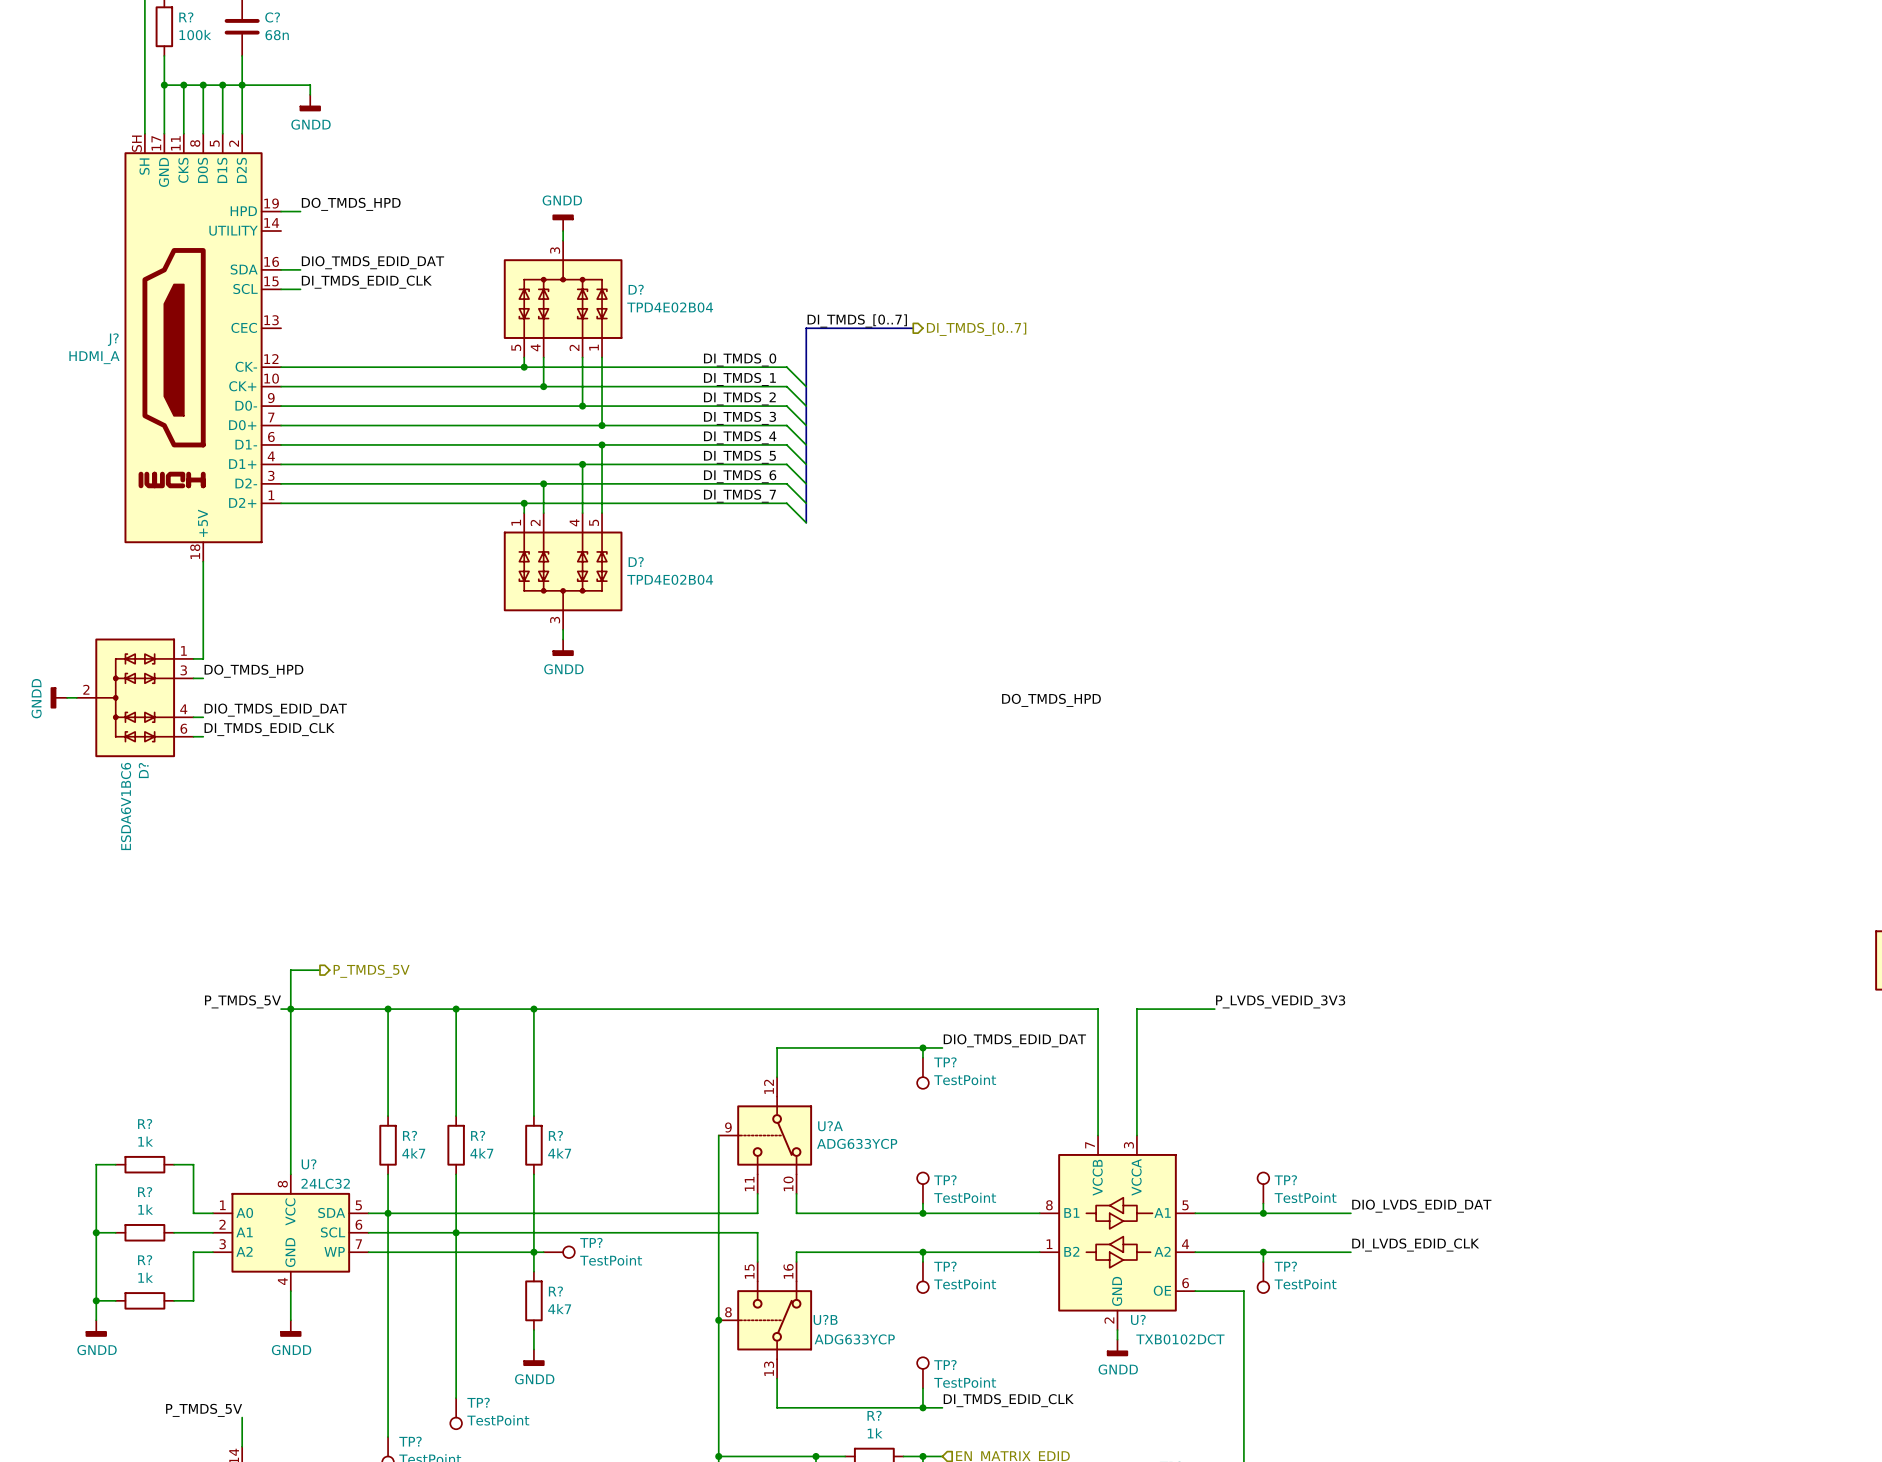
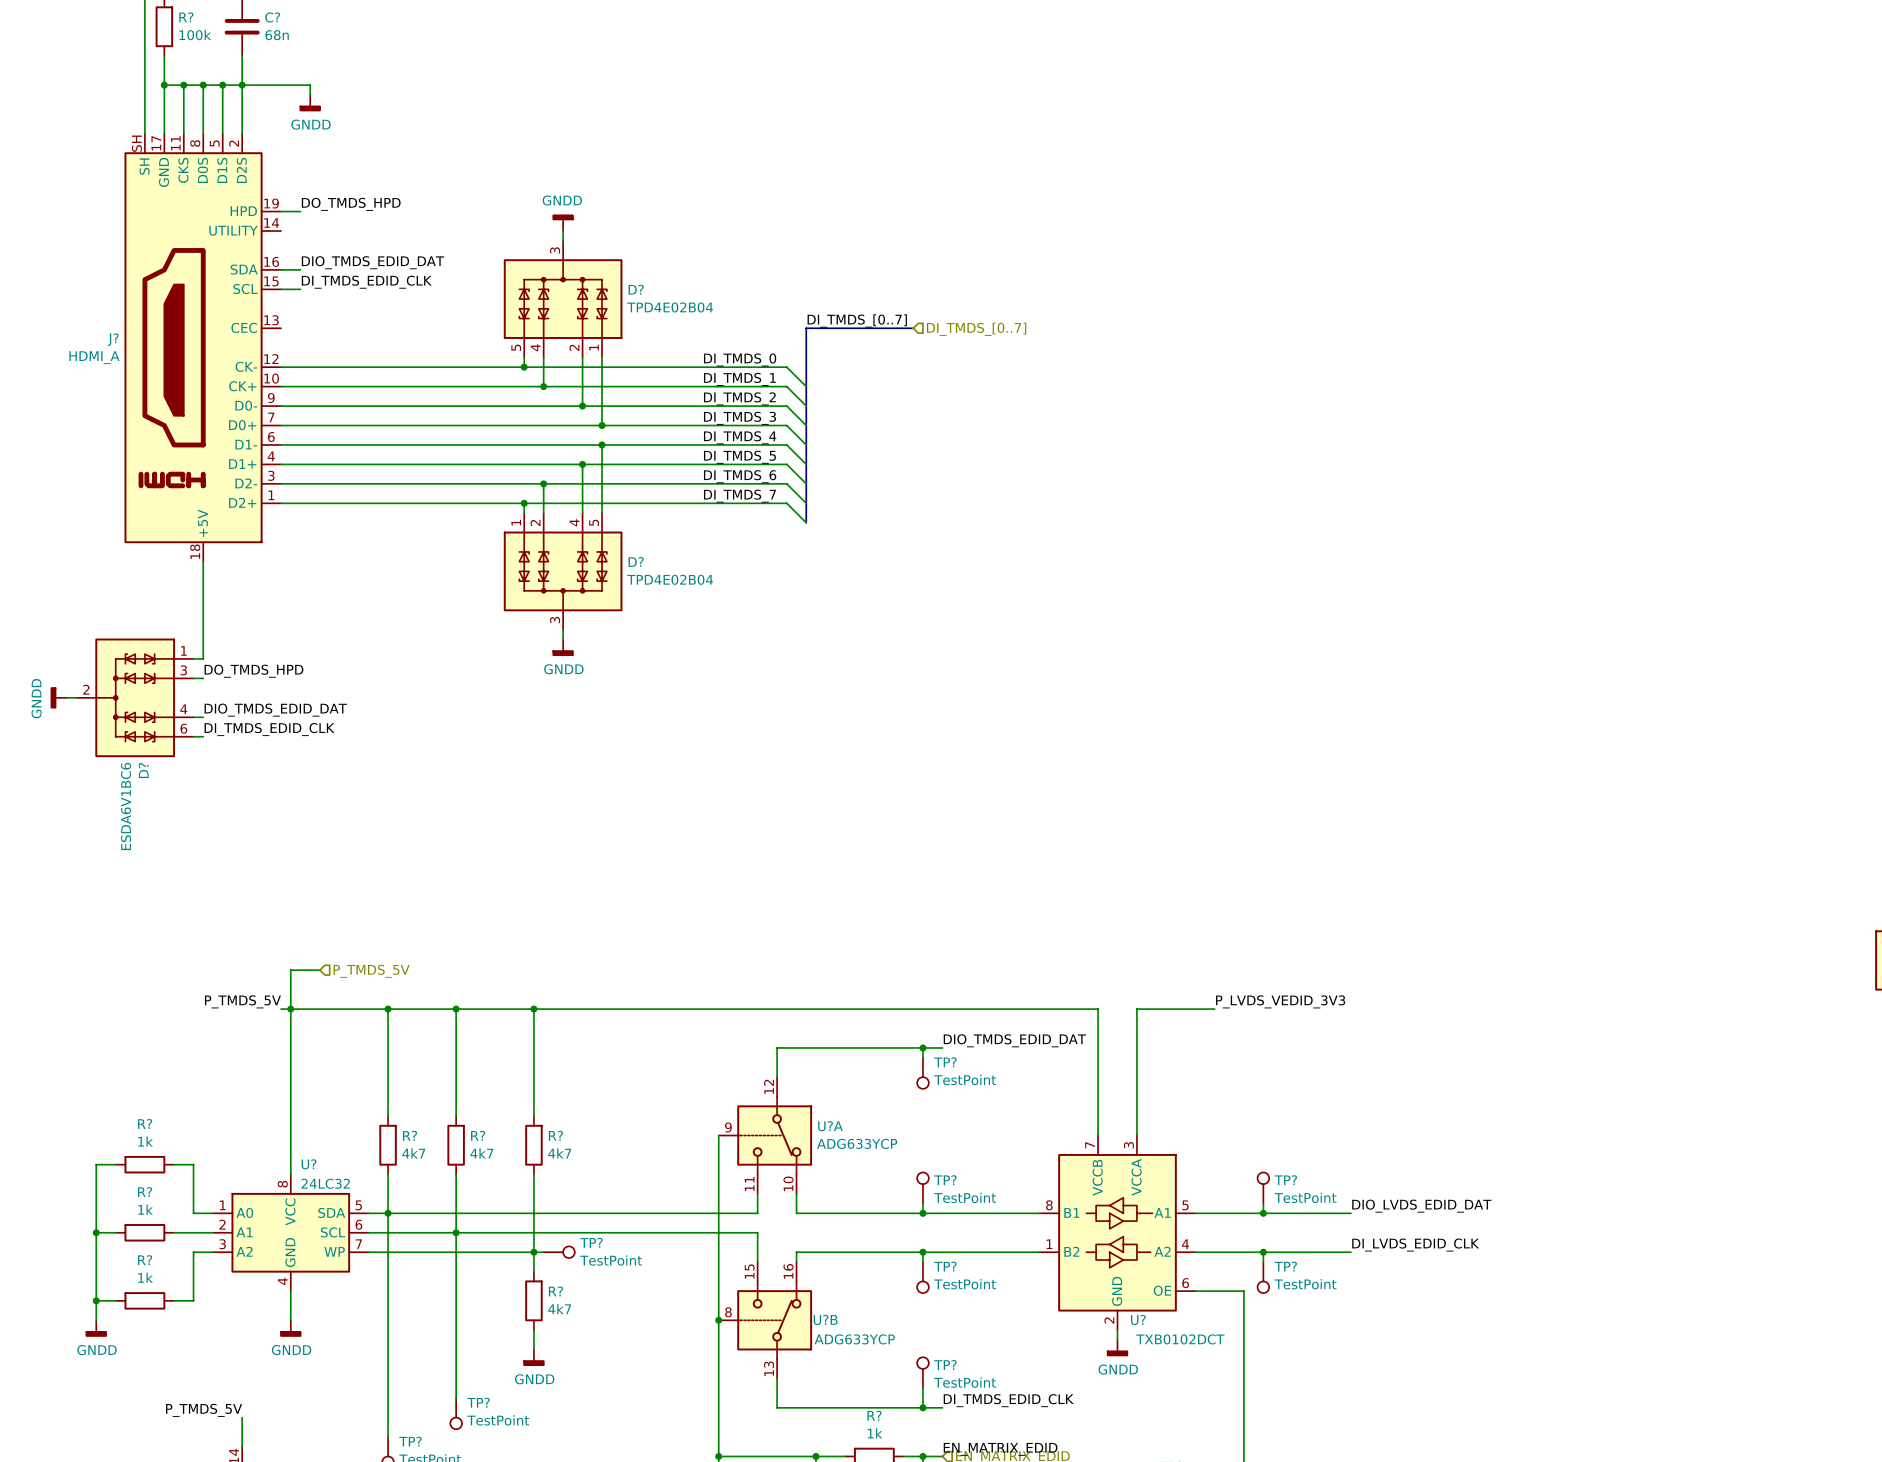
hierarchical label shape: output (976, 329) -> input (976, 329)
label: DO_TMDS_HPD (1051, 700) -> none
hierarchical label shape: output (371, 971) -> input (371, 971)
label: none -> EN_MATRIX_EDID (1000, 1449)

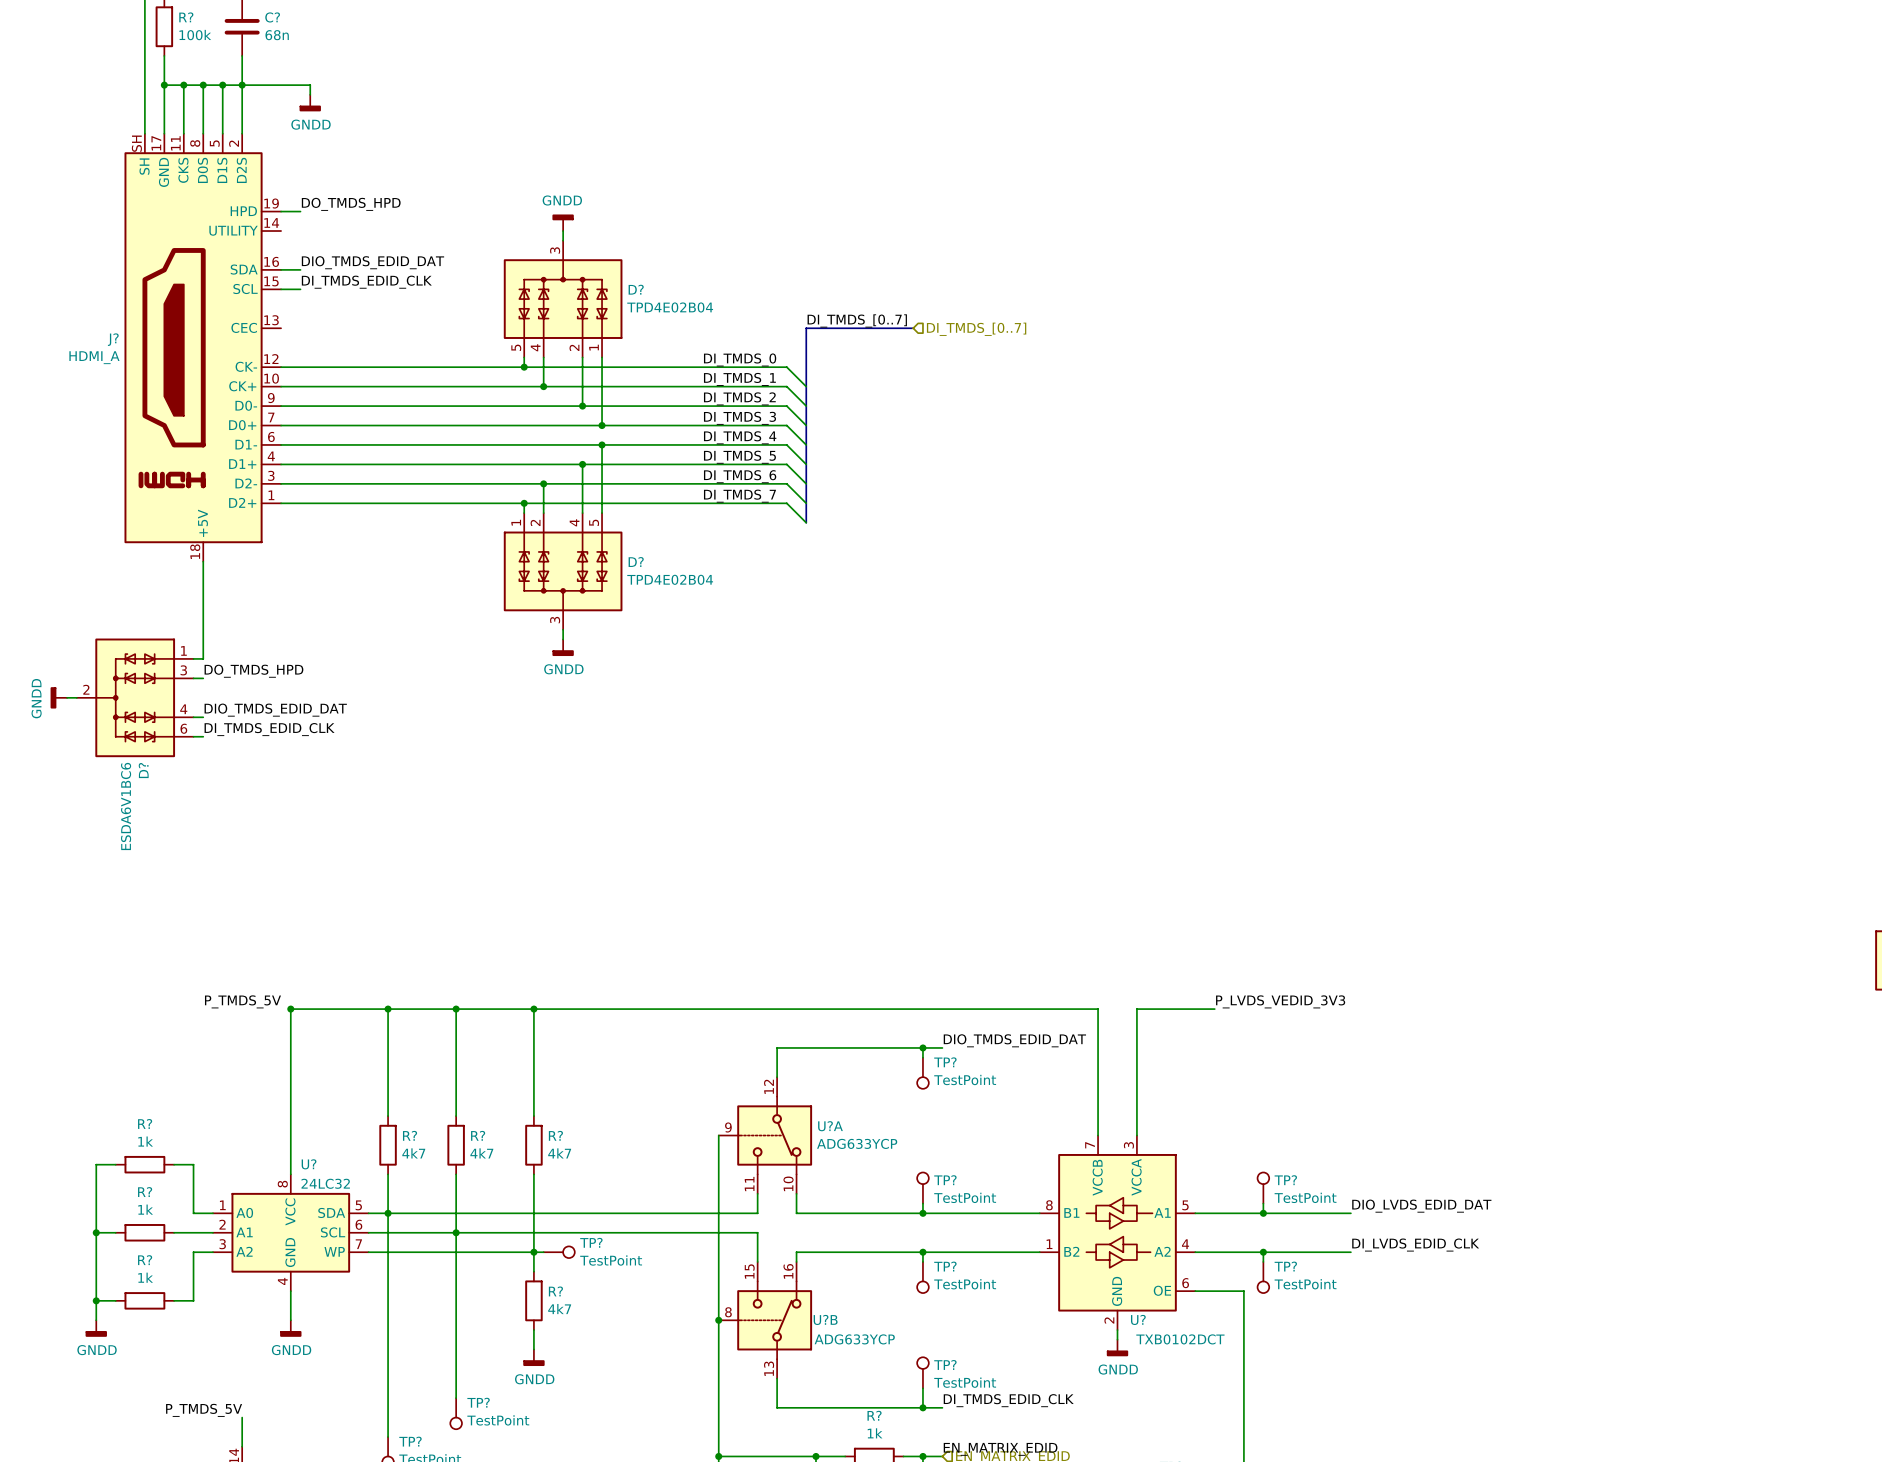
wire: (319, 970) (290, 970) (290, 1009) (281, 1009) -> none
hierarchical label: P_TMDS_5V (371, 971) -> none

